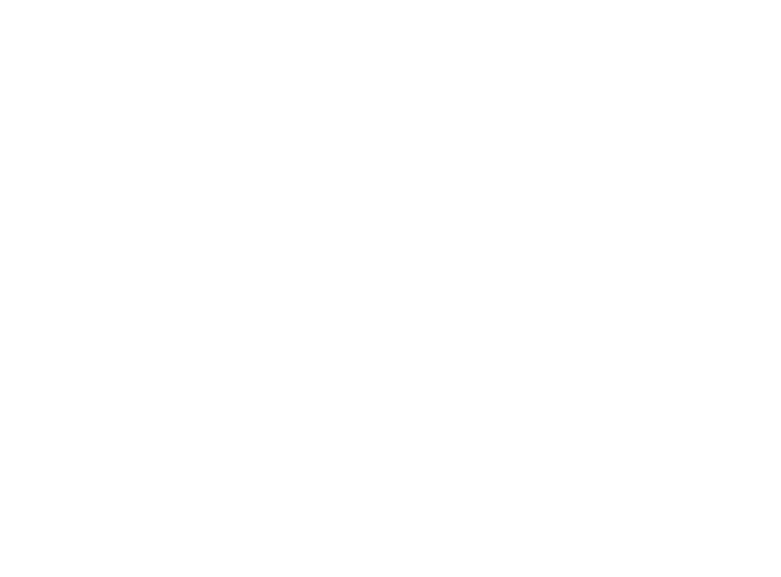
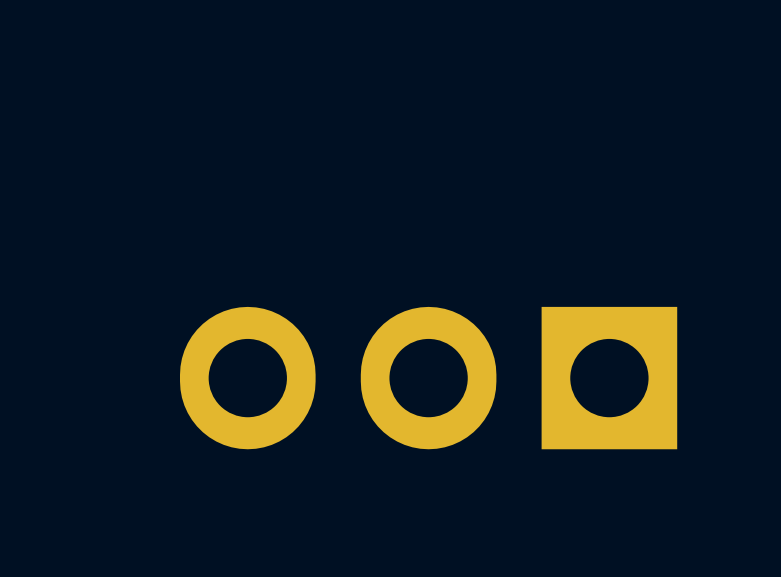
part: none -> (428, 378)

